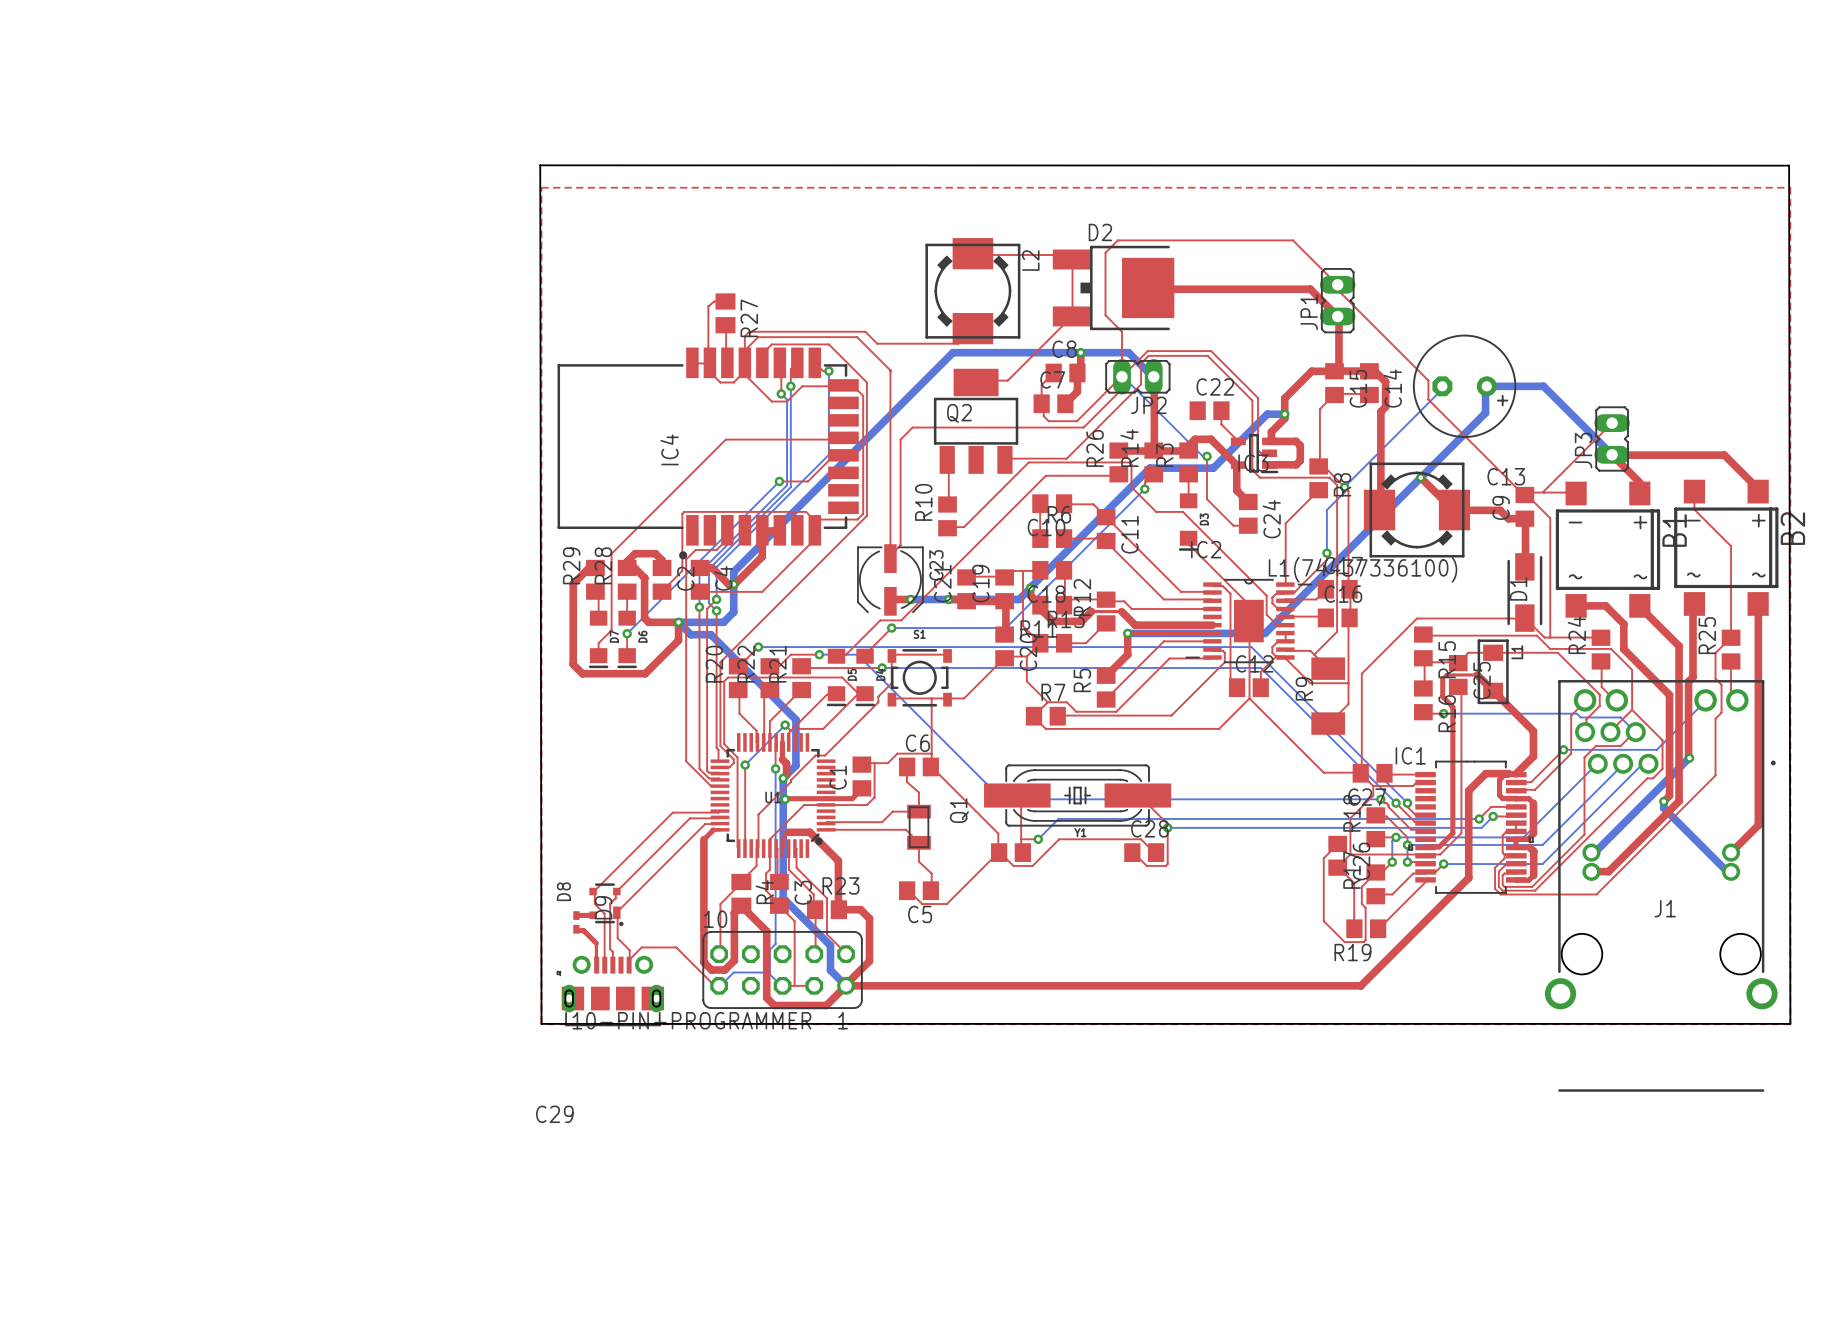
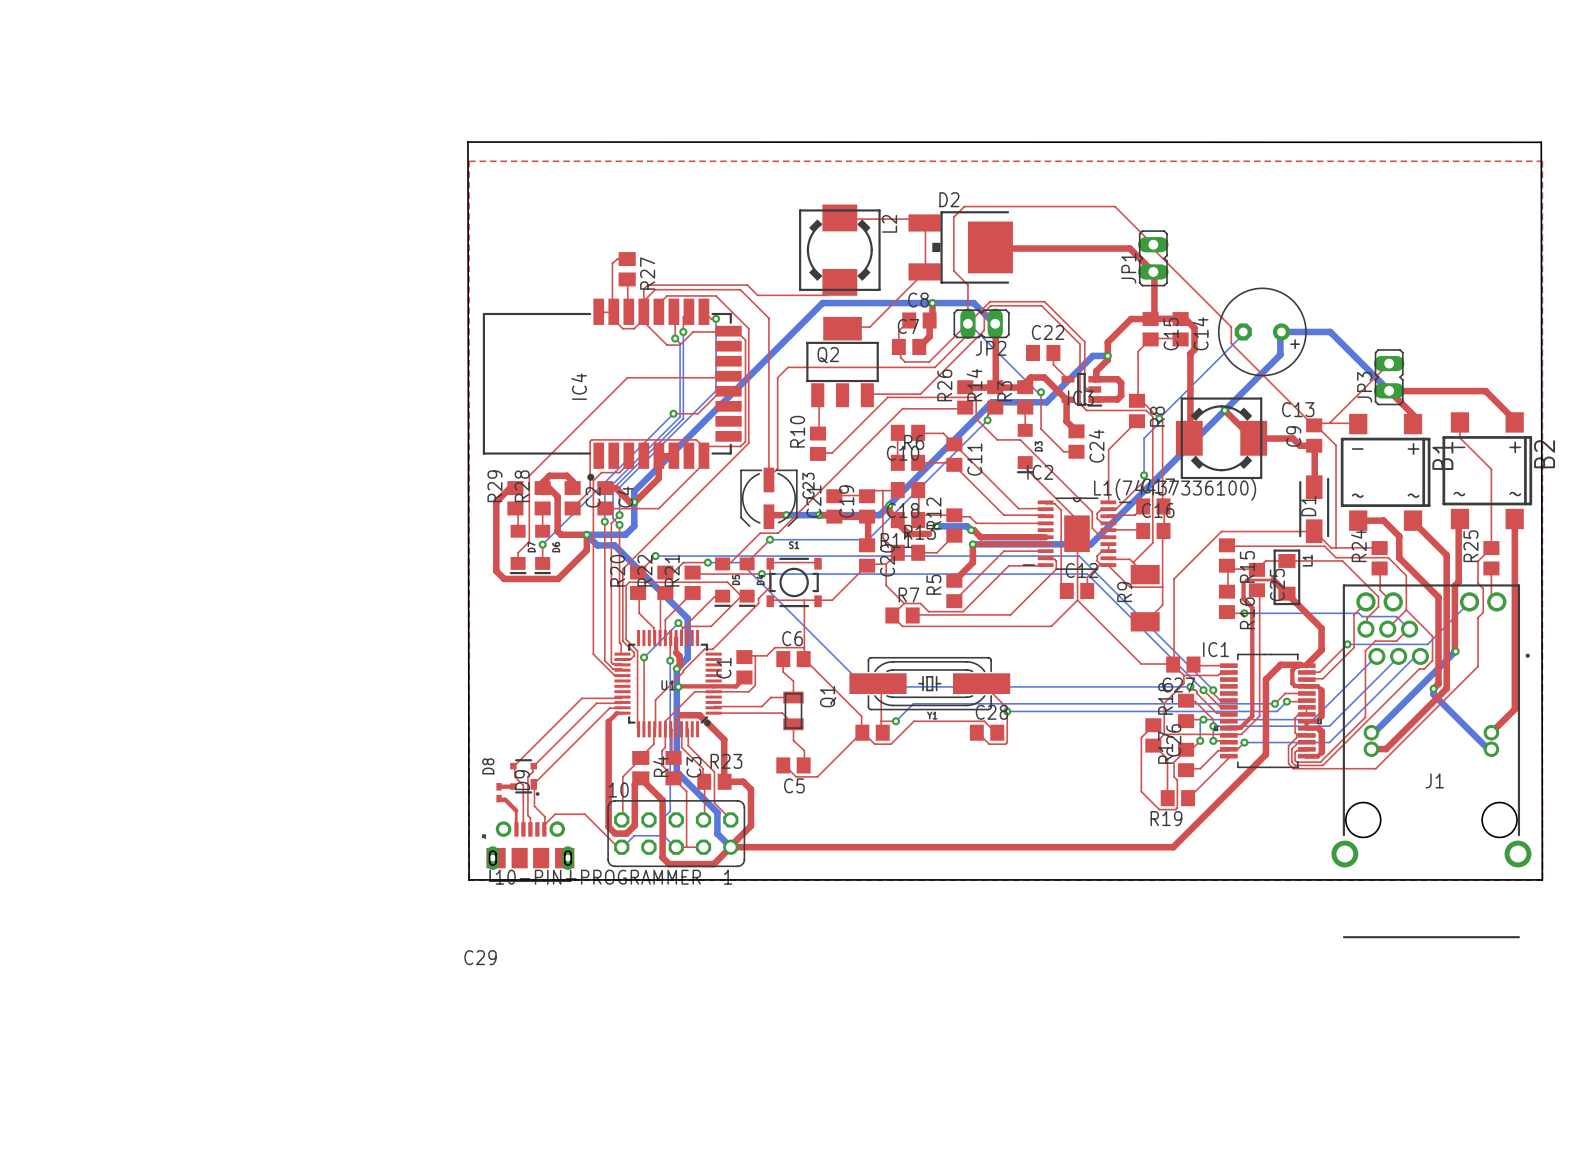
bottom track: none -> (936, 526) (967, 526) (971, 530)
via: none -> (936, 526)
via: none -> (971, 530)
top track: (1076, 621) (1081, 621) (1091, 611) (1121, 611) (1136, 625) -> (971, 530) (980, 537)

